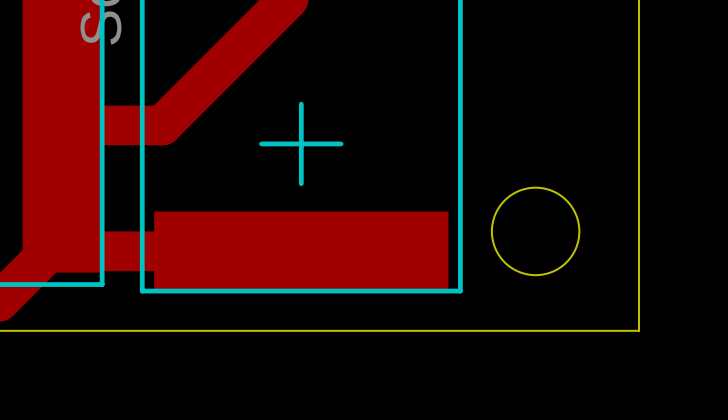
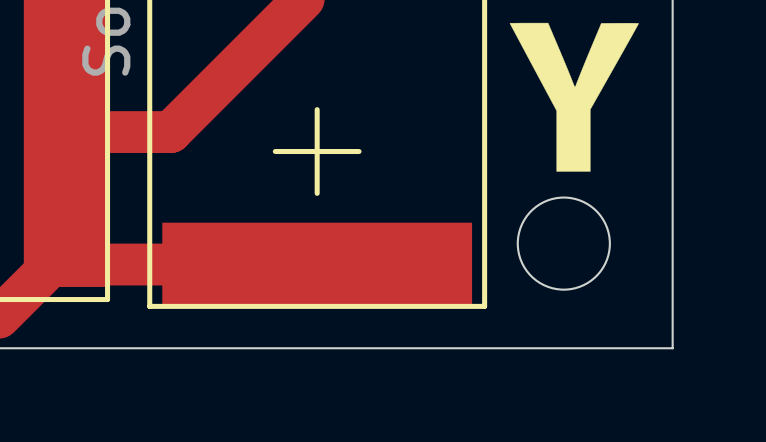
drawing: none -> [509, 22, 639, 172]

